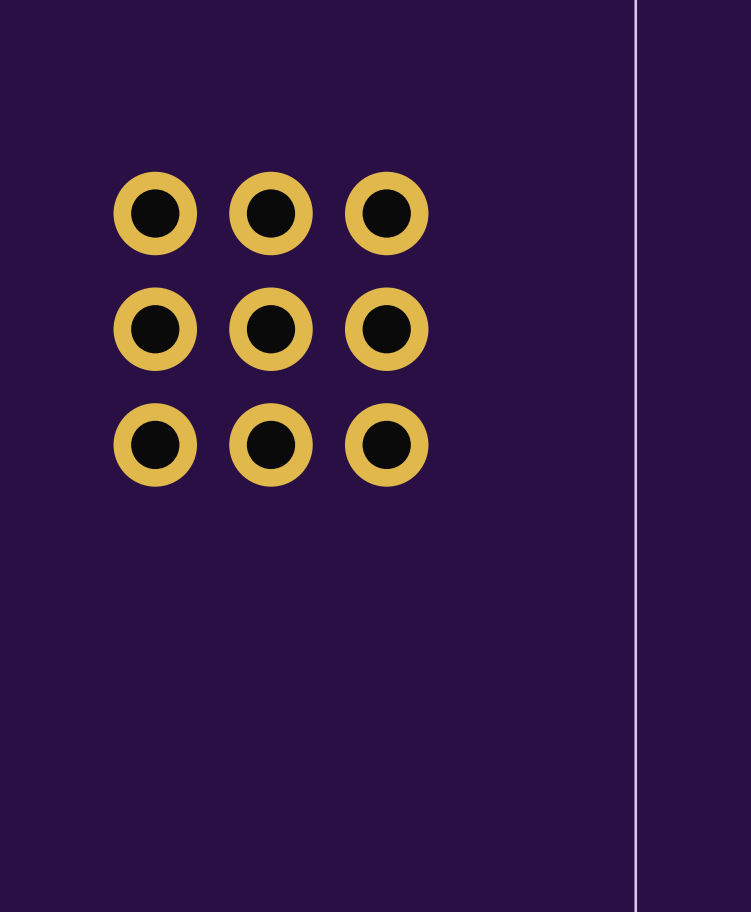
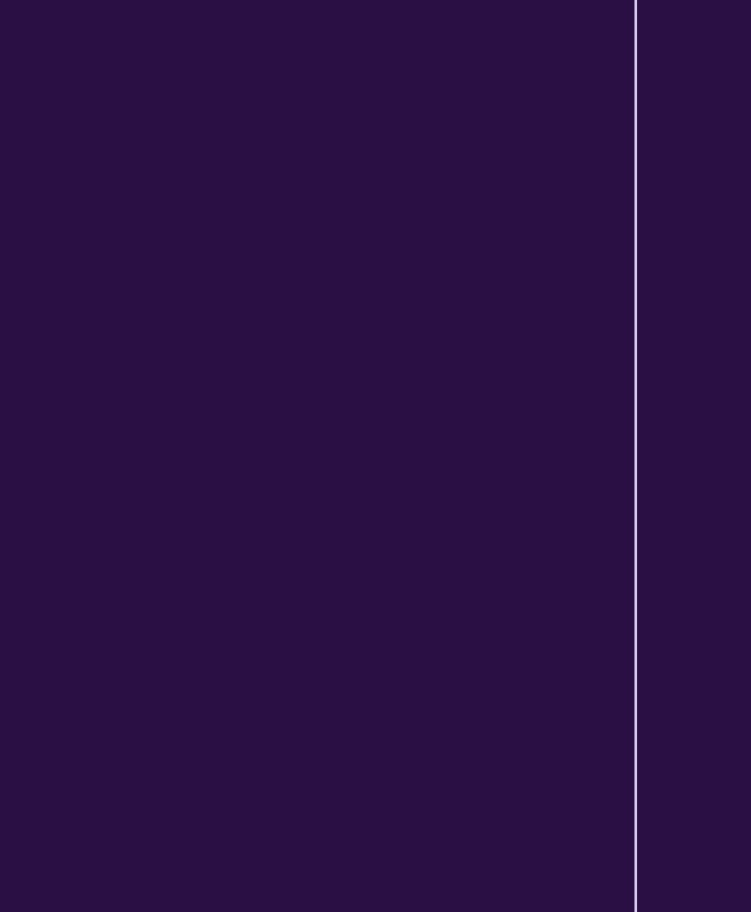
part: (270, 329) -> none

